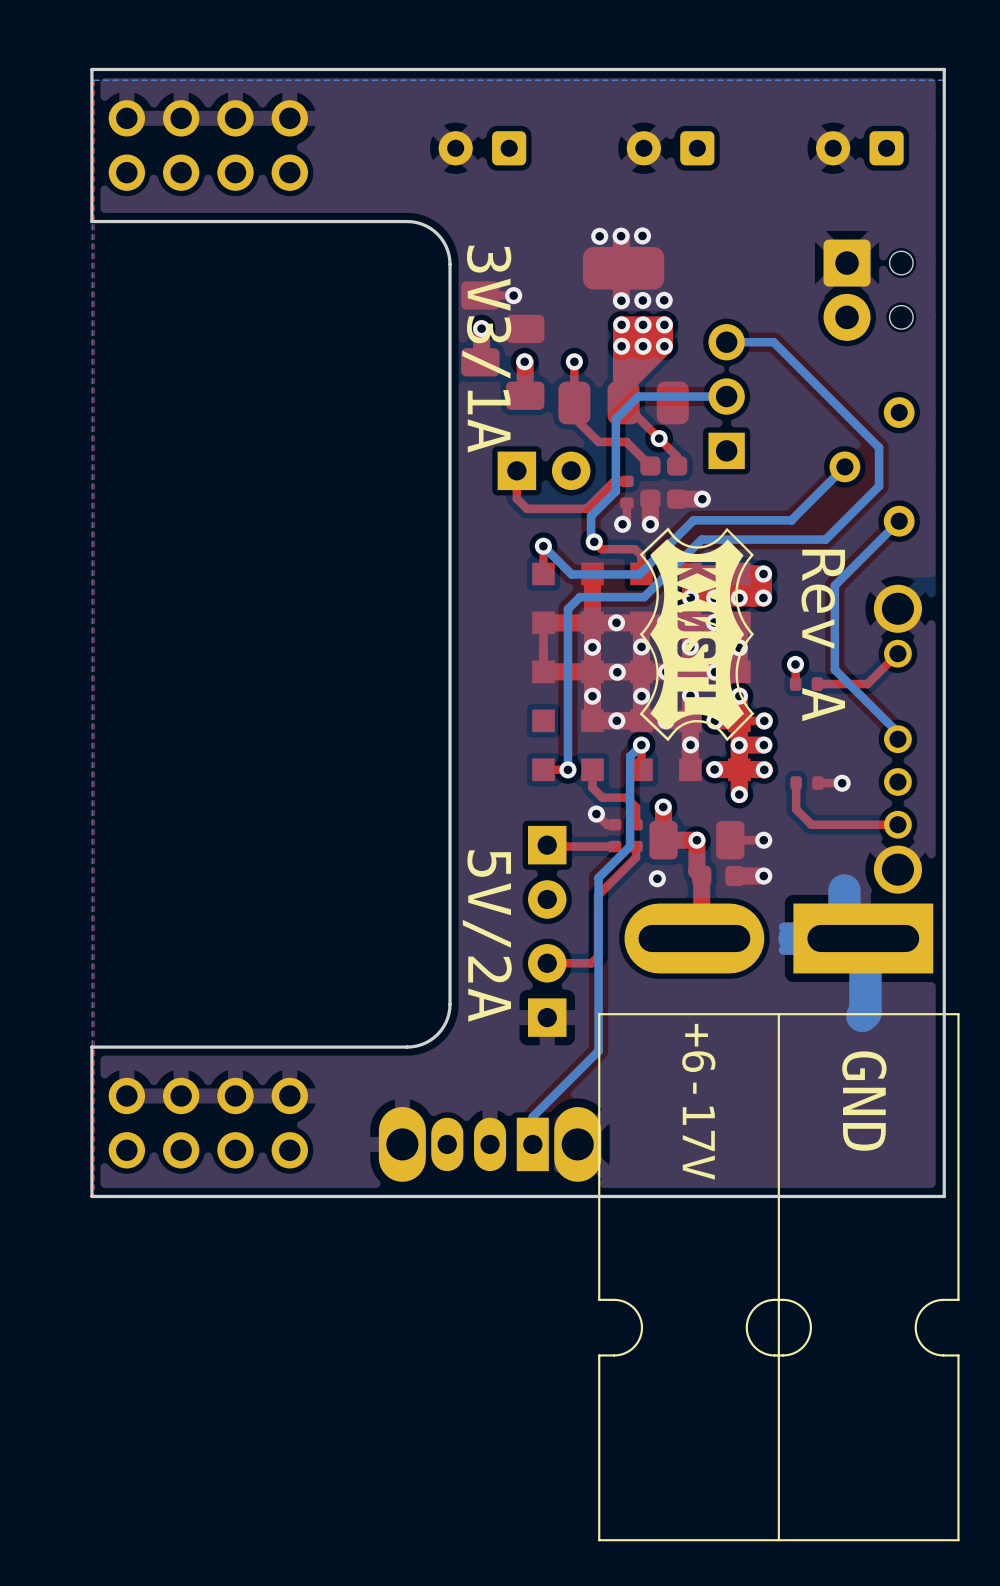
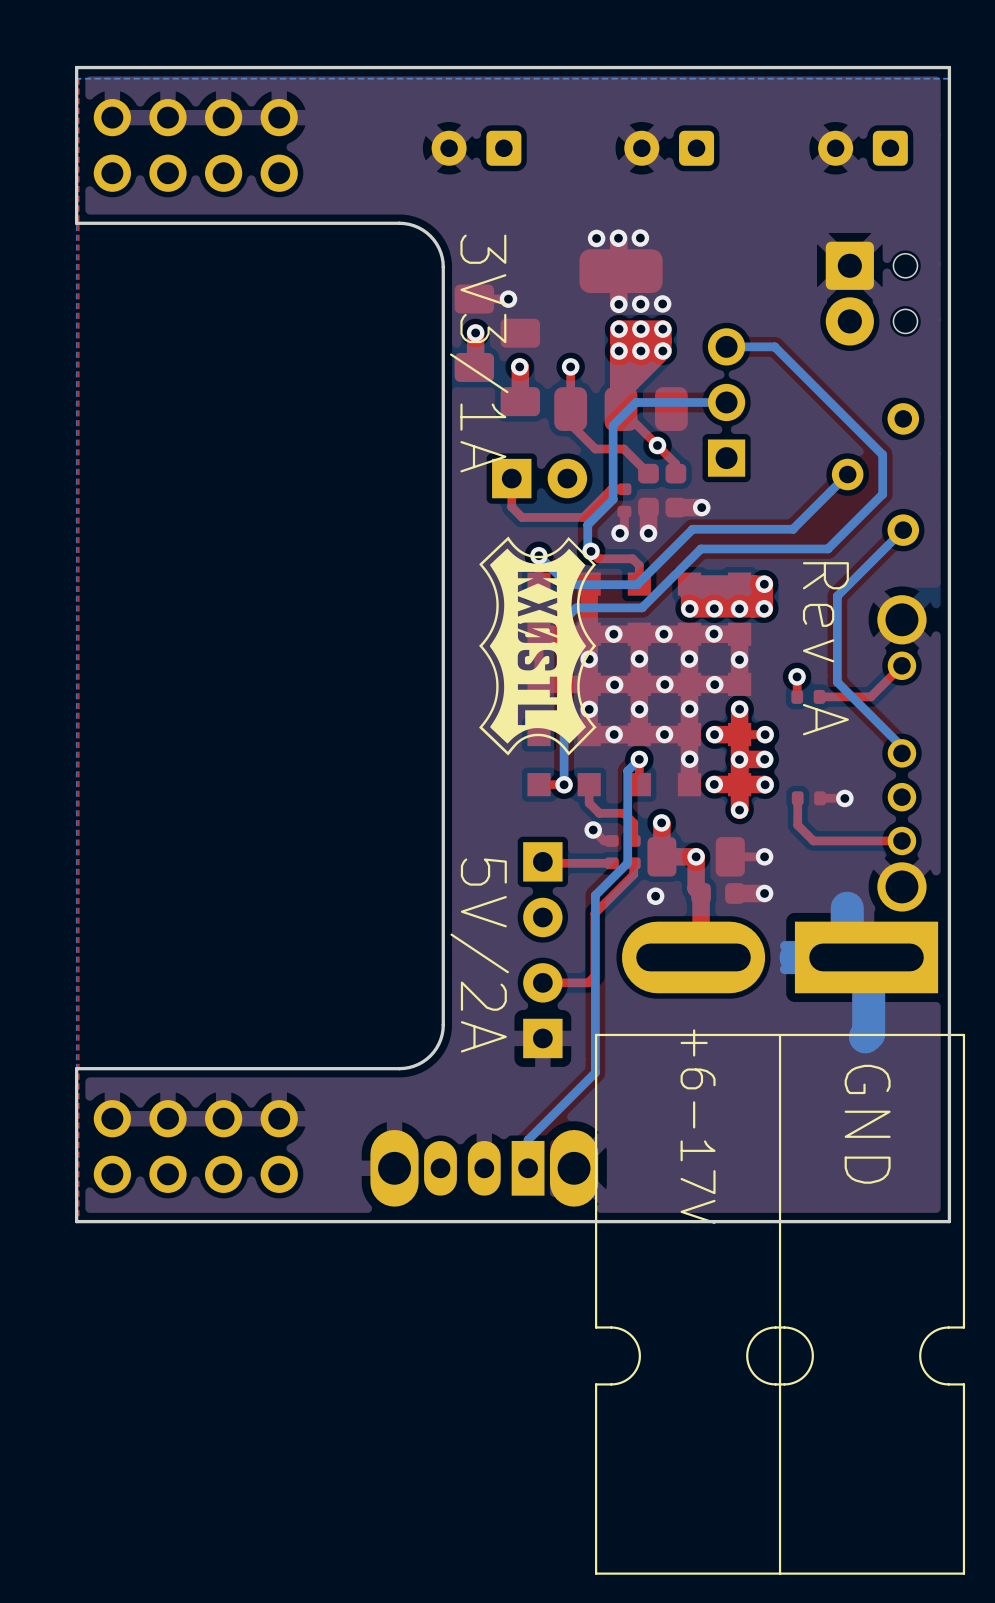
drawing position: (697, 634) -> (537, 645)

